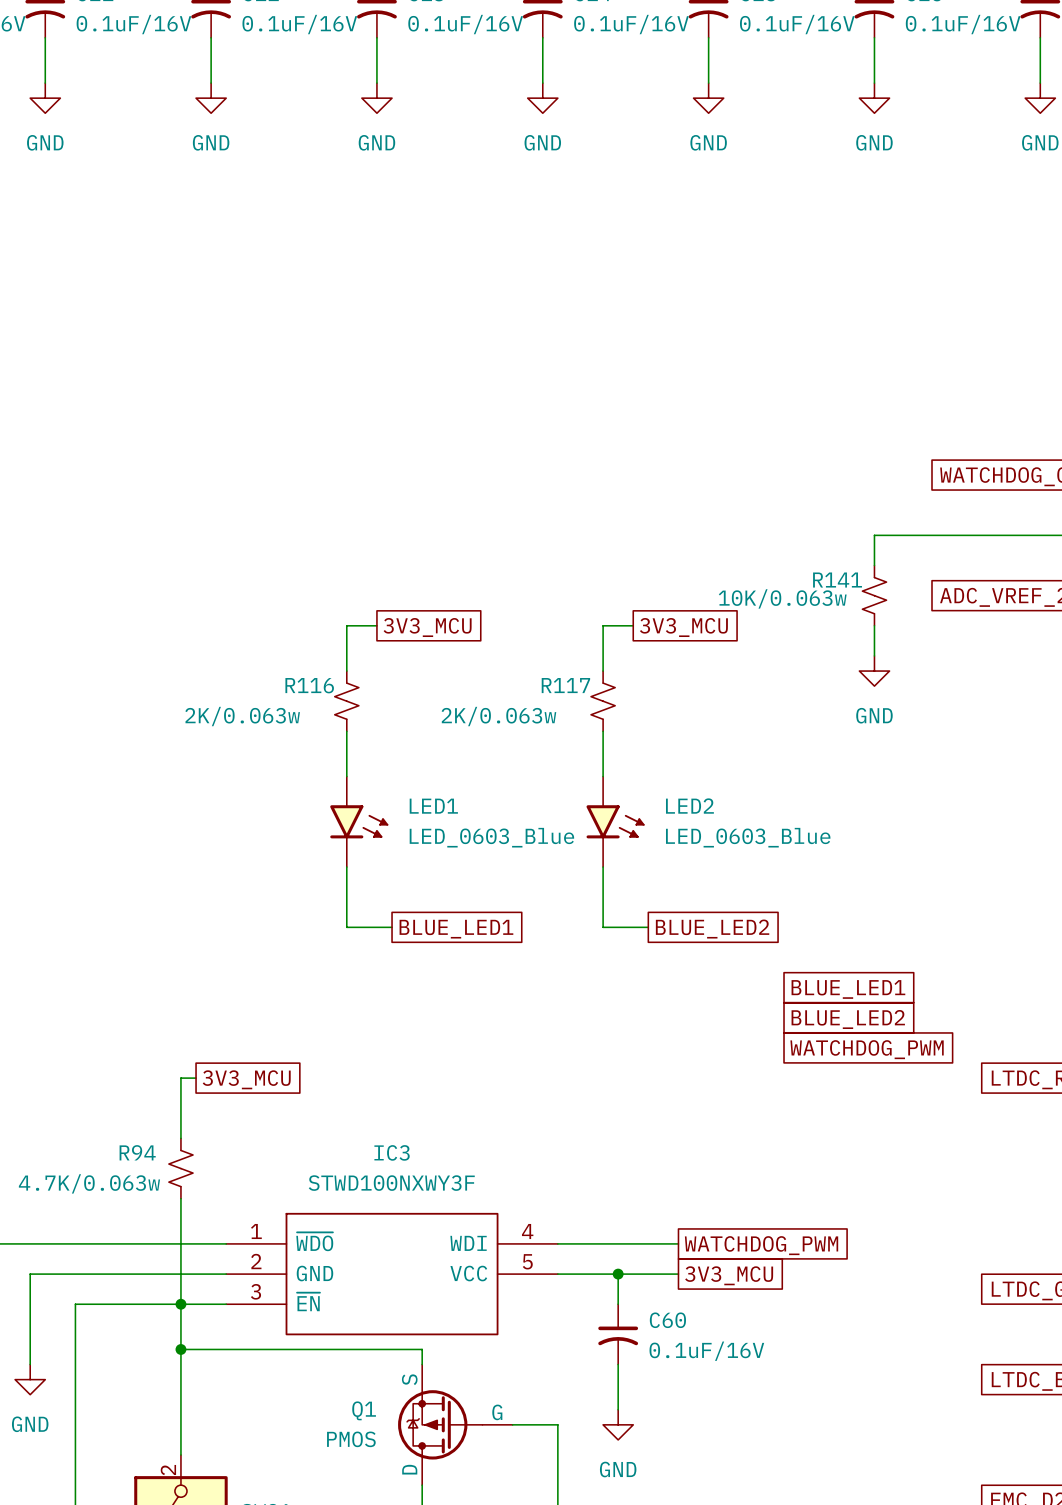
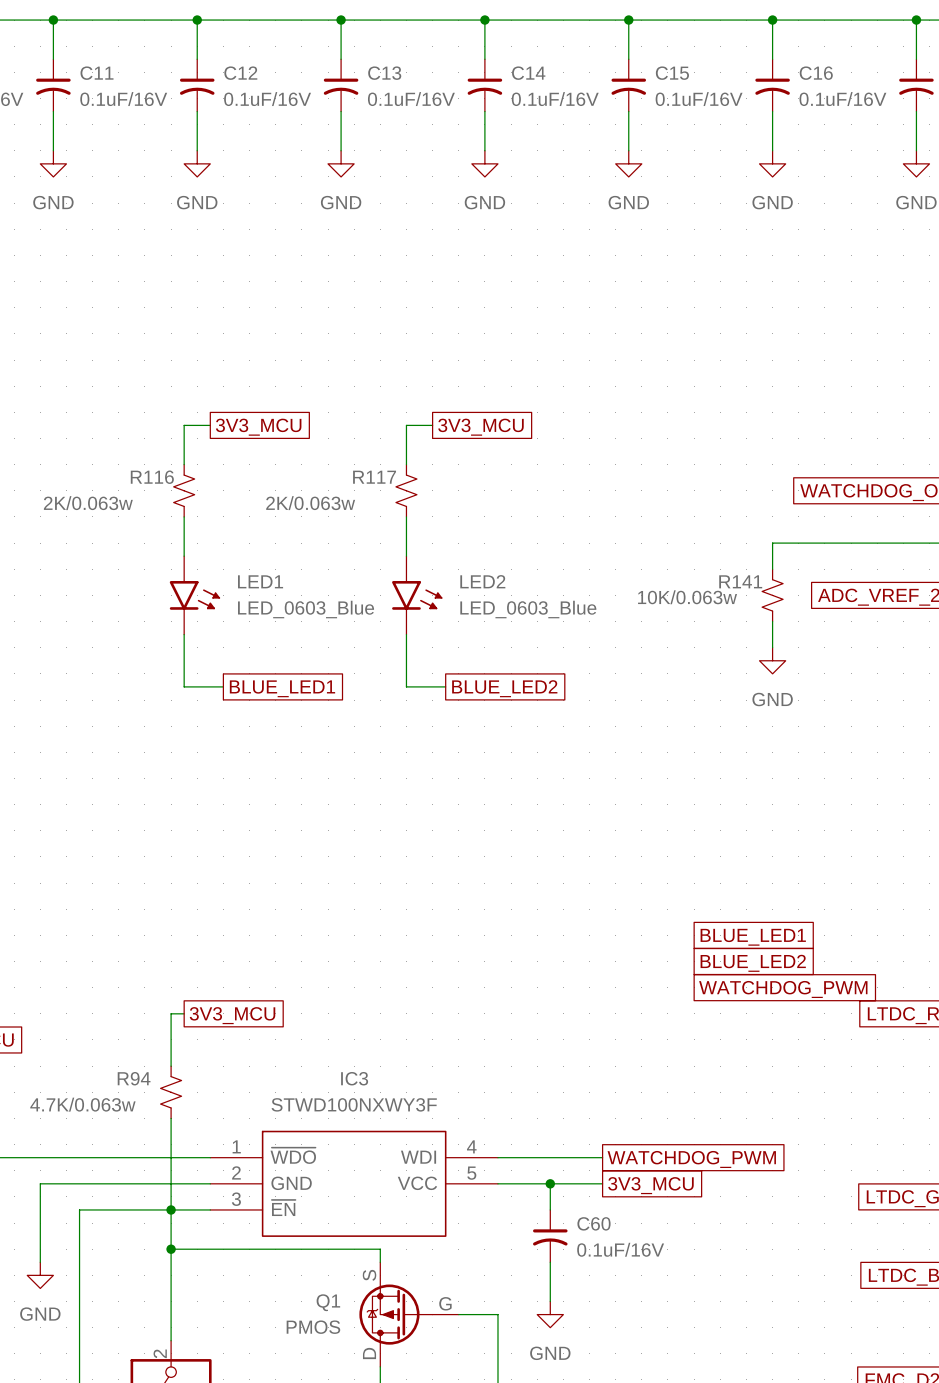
global label: none -> 3V3_MCU (258, 427)
global label: none -> 3V3_MCU (480, 427)
wire: (376, 625) (346, 625) (346, 671) -> (210, 425) (184, 425) (184, 464)
wire: (633, 625) (603, 625) (603, 671) -> (432, 425) (406, 425) (406, 464)
global label: 3V3_MCU (427, 627) -> none
global label: 3V3_MCU (683, 627) -> none
R116 position: (346, 701) -> (184, 490)
R117 position: (603, 701) -> (406, 490)
wire: (346, 731) (346, 776) -> (184, 516) (184, 556)
wire: (603, 731) (603, 776) -> (406, 516) (406, 556)
LED1 position: (359, 821) -> (195, 595)
LED2 position: (615, 821) -> (417, 595)
wire: (346, 867) (346, 927) (392, 927) -> (184, 634) (184, 686) (223, 686)
wire: (603, 867) (603, 927) (648, 927) -> (406, 634) (406, 686) (445, 686)
global label position: BLUE_LED1 (456, 929) -> BLUE_LED1 (282, 688)
global label position: BLUE_LED2 (712, 929) -> BLUE_LED2 (504, 688)

